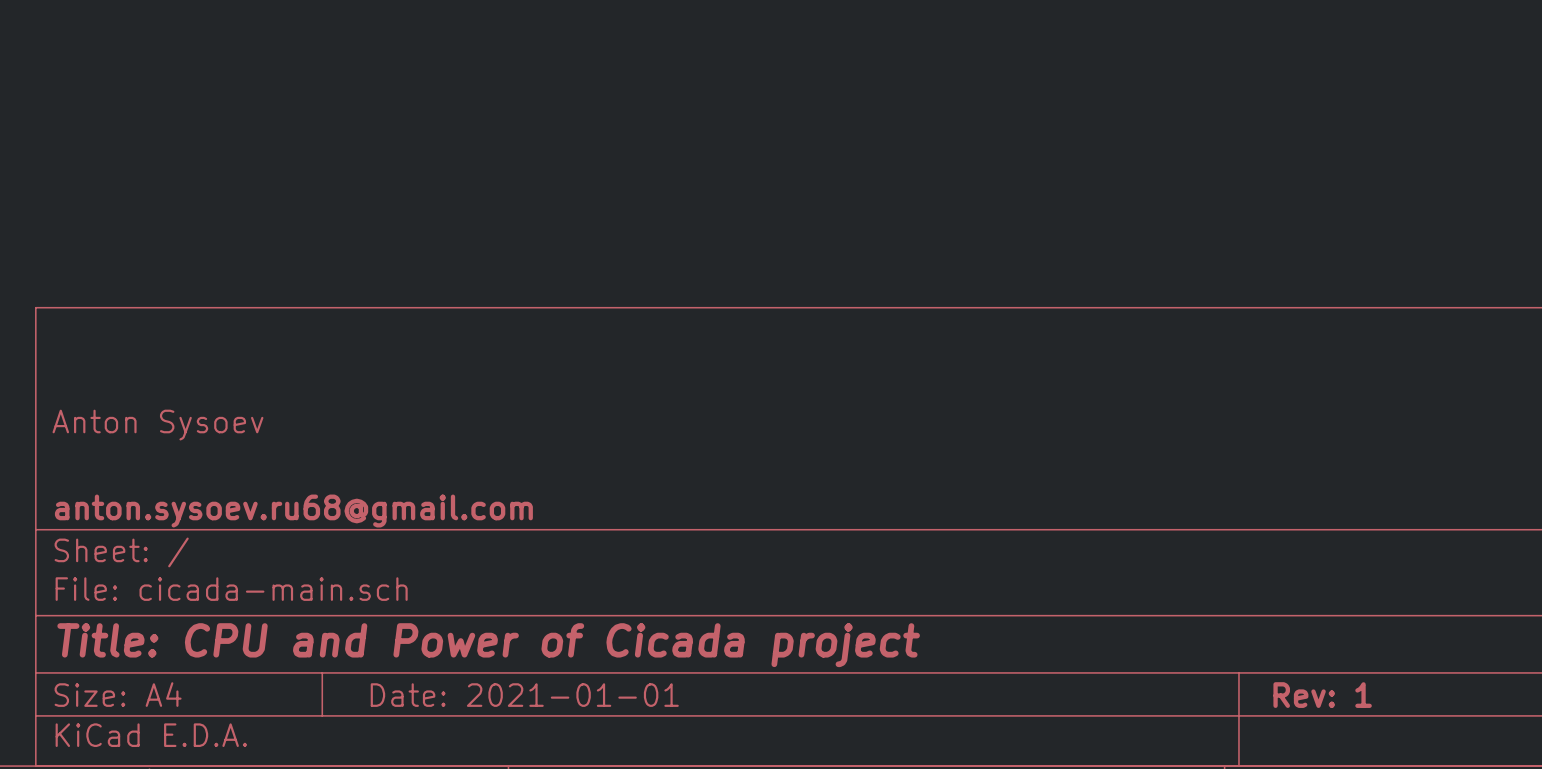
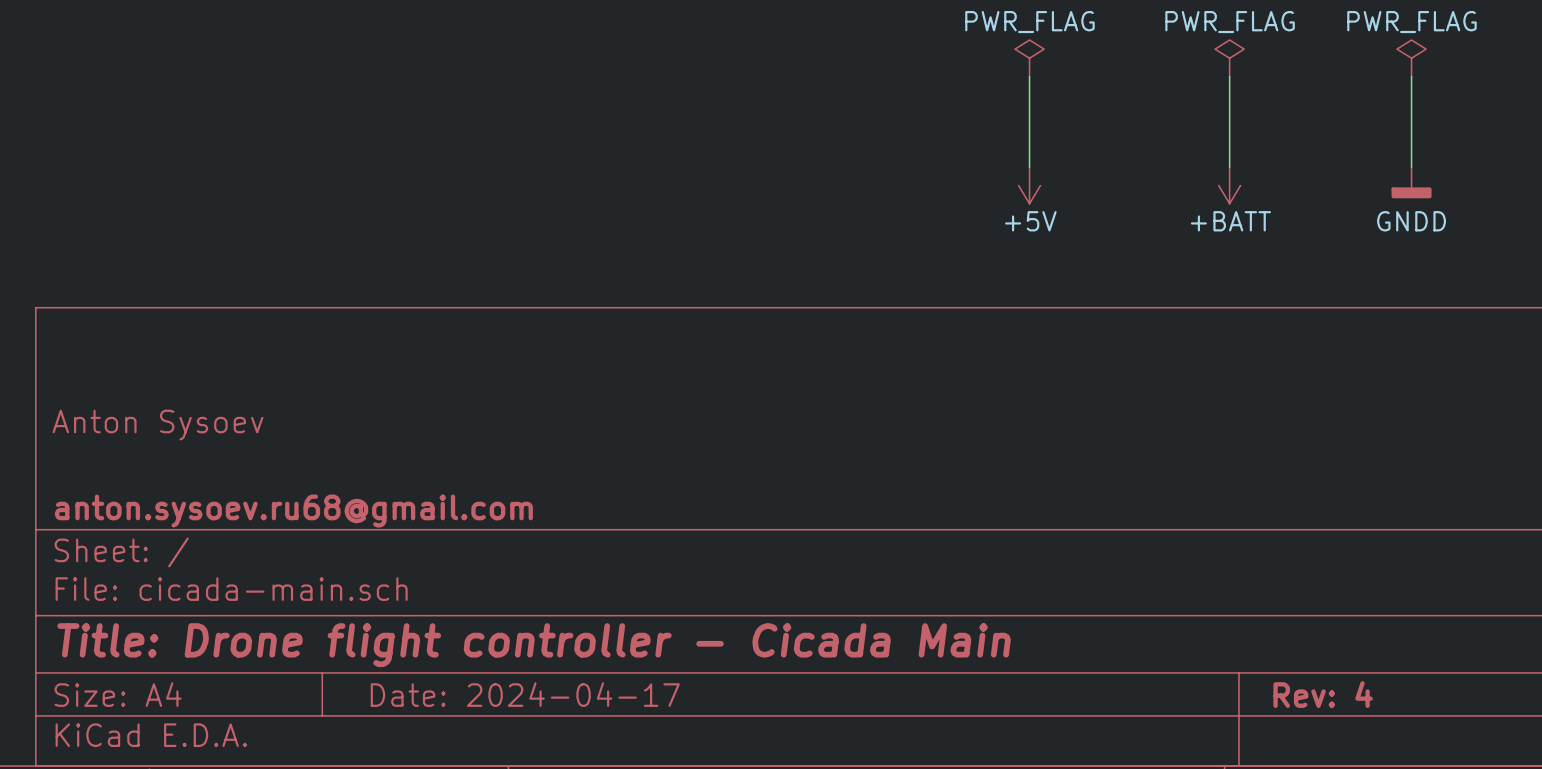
power symbol: none -> PWR_FLAG (1029, 58)
power symbol: none -> PWR_FLAG (1229, 58)
power symbol: none -> PWR_FLAG (1411, 58)
wire: none -> (1029, 76) (1029, 167)
wire: none -> (1229, 76) (1229, 167)
wire: none -> (1411, 76) (1411, 167)
power symbol: none -> GNDD (1411, 182)
power symbol: none -> +5V (1029, 185)
power symbol: none -> +BATT (1229, 185)
title block: Title: CPU and Power of Cicada project (488, 645) -> Title: Drone flight controller - Cicada Main (534, 645)
title block: Date: 2021-01-01 (524, 695) -> Date: 2024-04-17 (525, 694)
title block: Rev: 1 (1322, 695) -> Rev: 4 (1323, 694)

